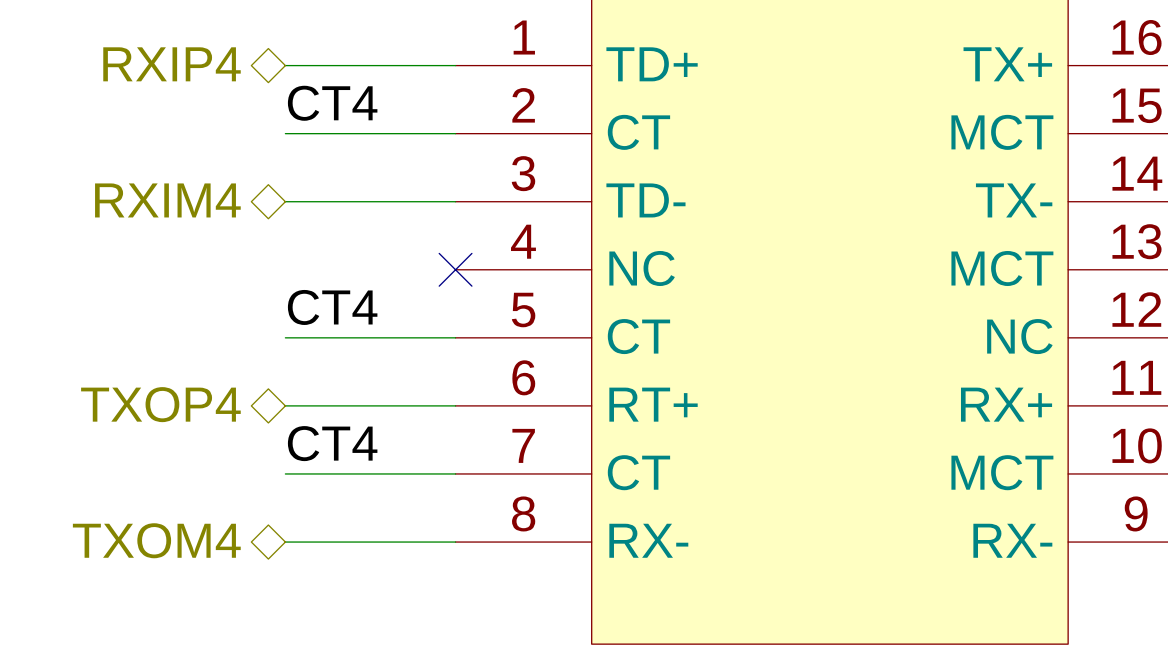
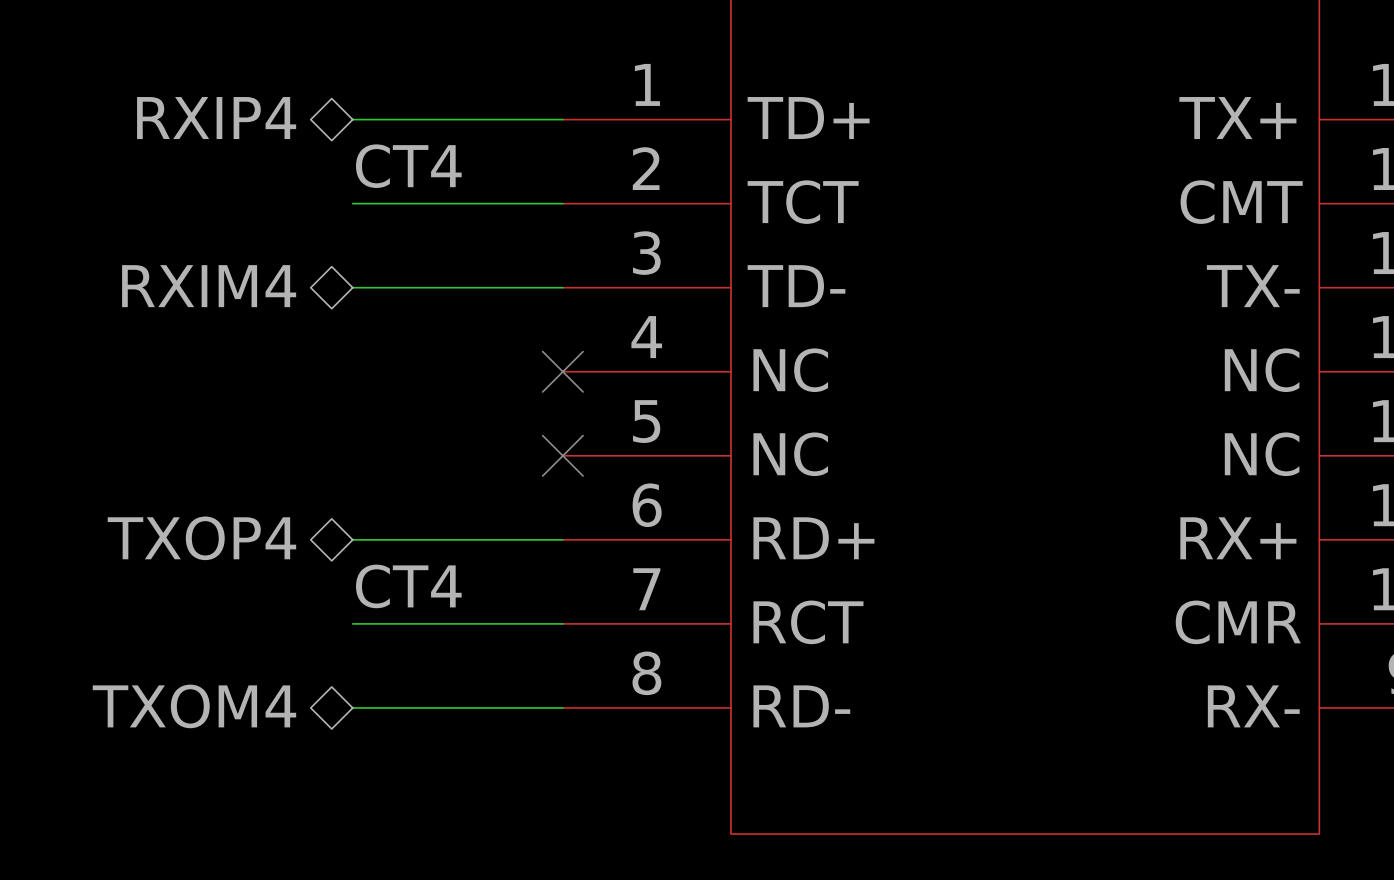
part pin name: CT (638, 132) -> TCT (803, 202)
part pin name: MCT (1002, 132) -> CMT (1241, 202)
part pin name: MCT (1002, 268) -> NC (1262, 370)
label: CT4 (332, 307) -> none
part pin name: CT (638, 336) -> NC (790, 454)
wire: (285, 337) (455, 337) -> none
no-connect mark: none -> (562, 455)
part pin name: RT+ (653, 404) -> RD+ (813, 538)
part pin name: CT (638, 472) -> RCT (808, 622)
part pin name: MCT (1002, 472) -> CMR (1238, 622)
part pin name: RX- (648, 540) -> RD- (801, 706)

